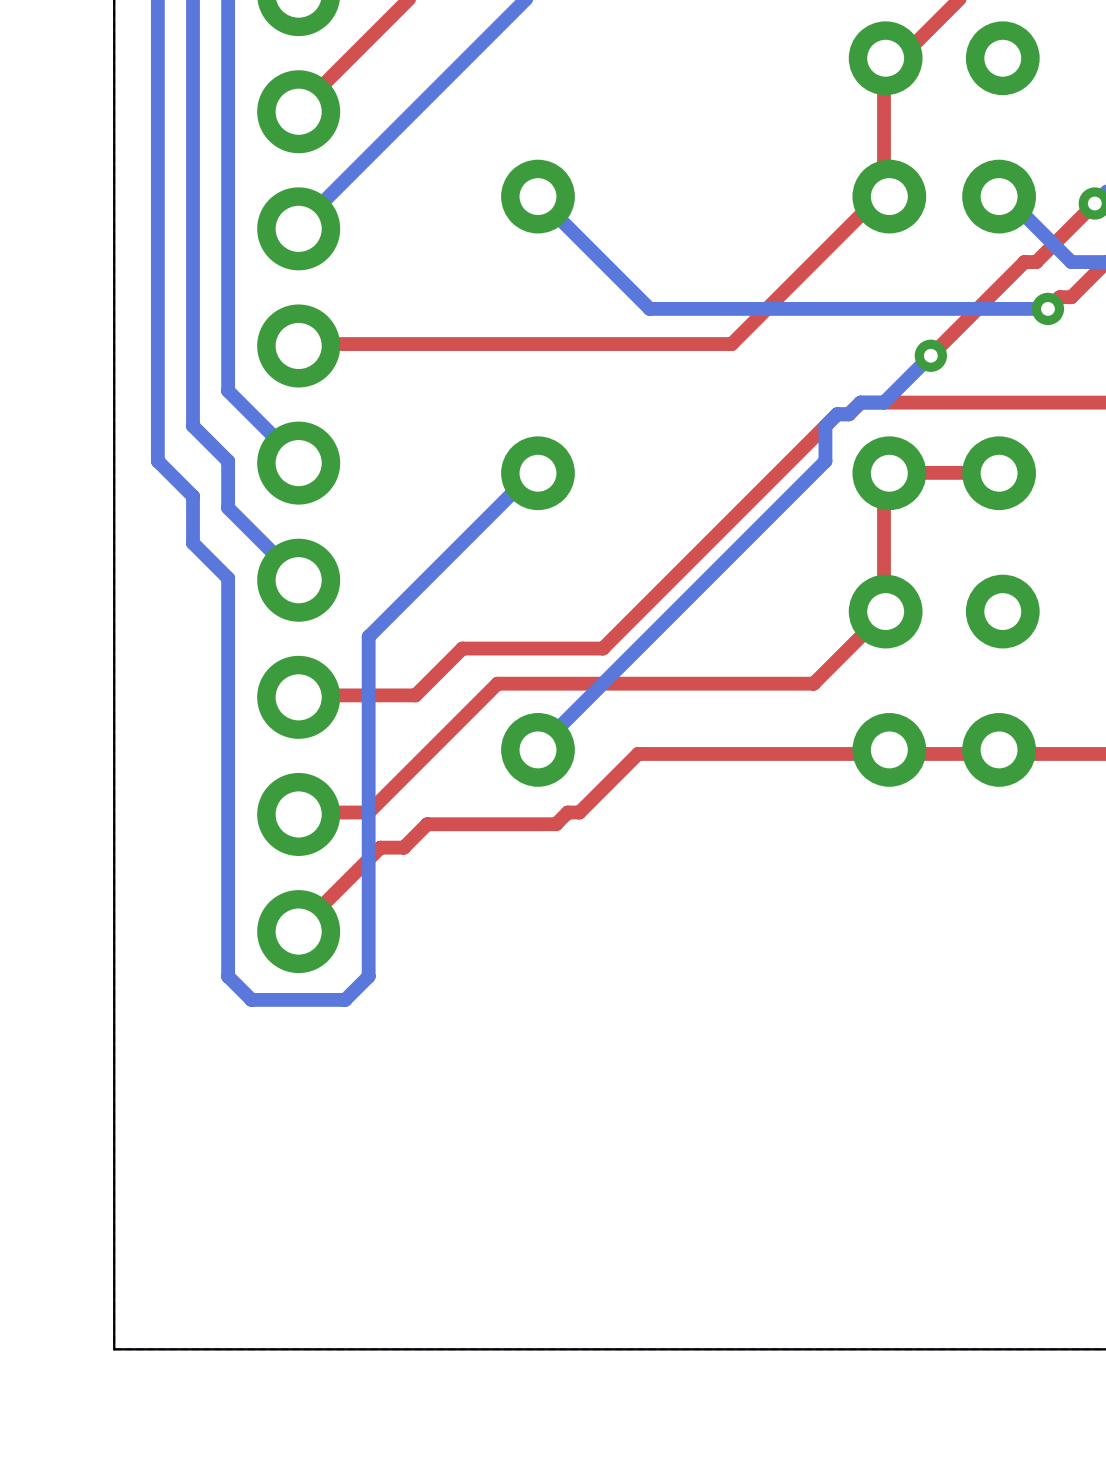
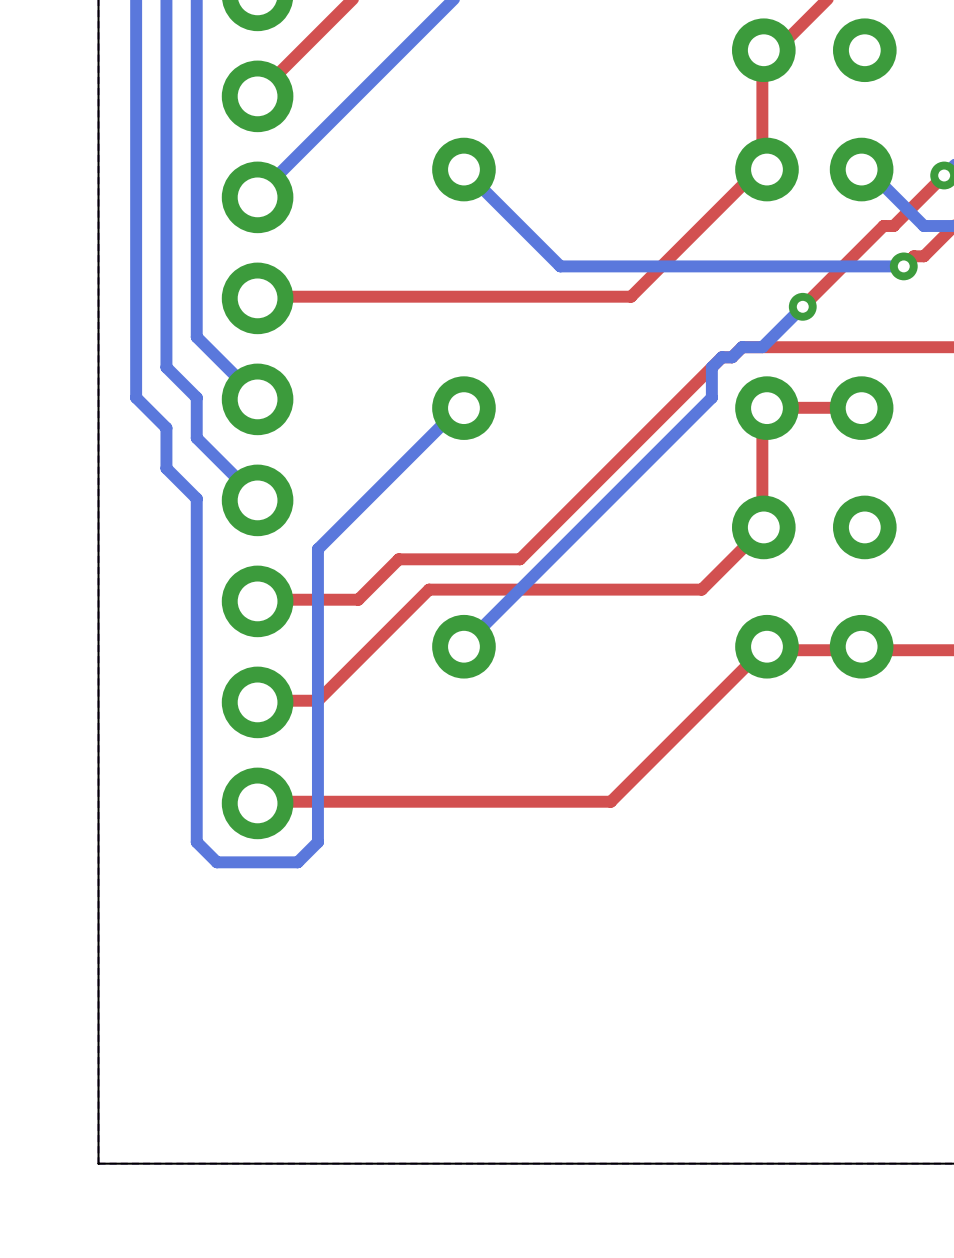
top track: (883, 753) (638, 753) (579, 812) (567, 812) (556, 824) (427, 824) (403, 847) (380, 847) (298, 929) -> (762, 650) (610, 801) (257, 801)

